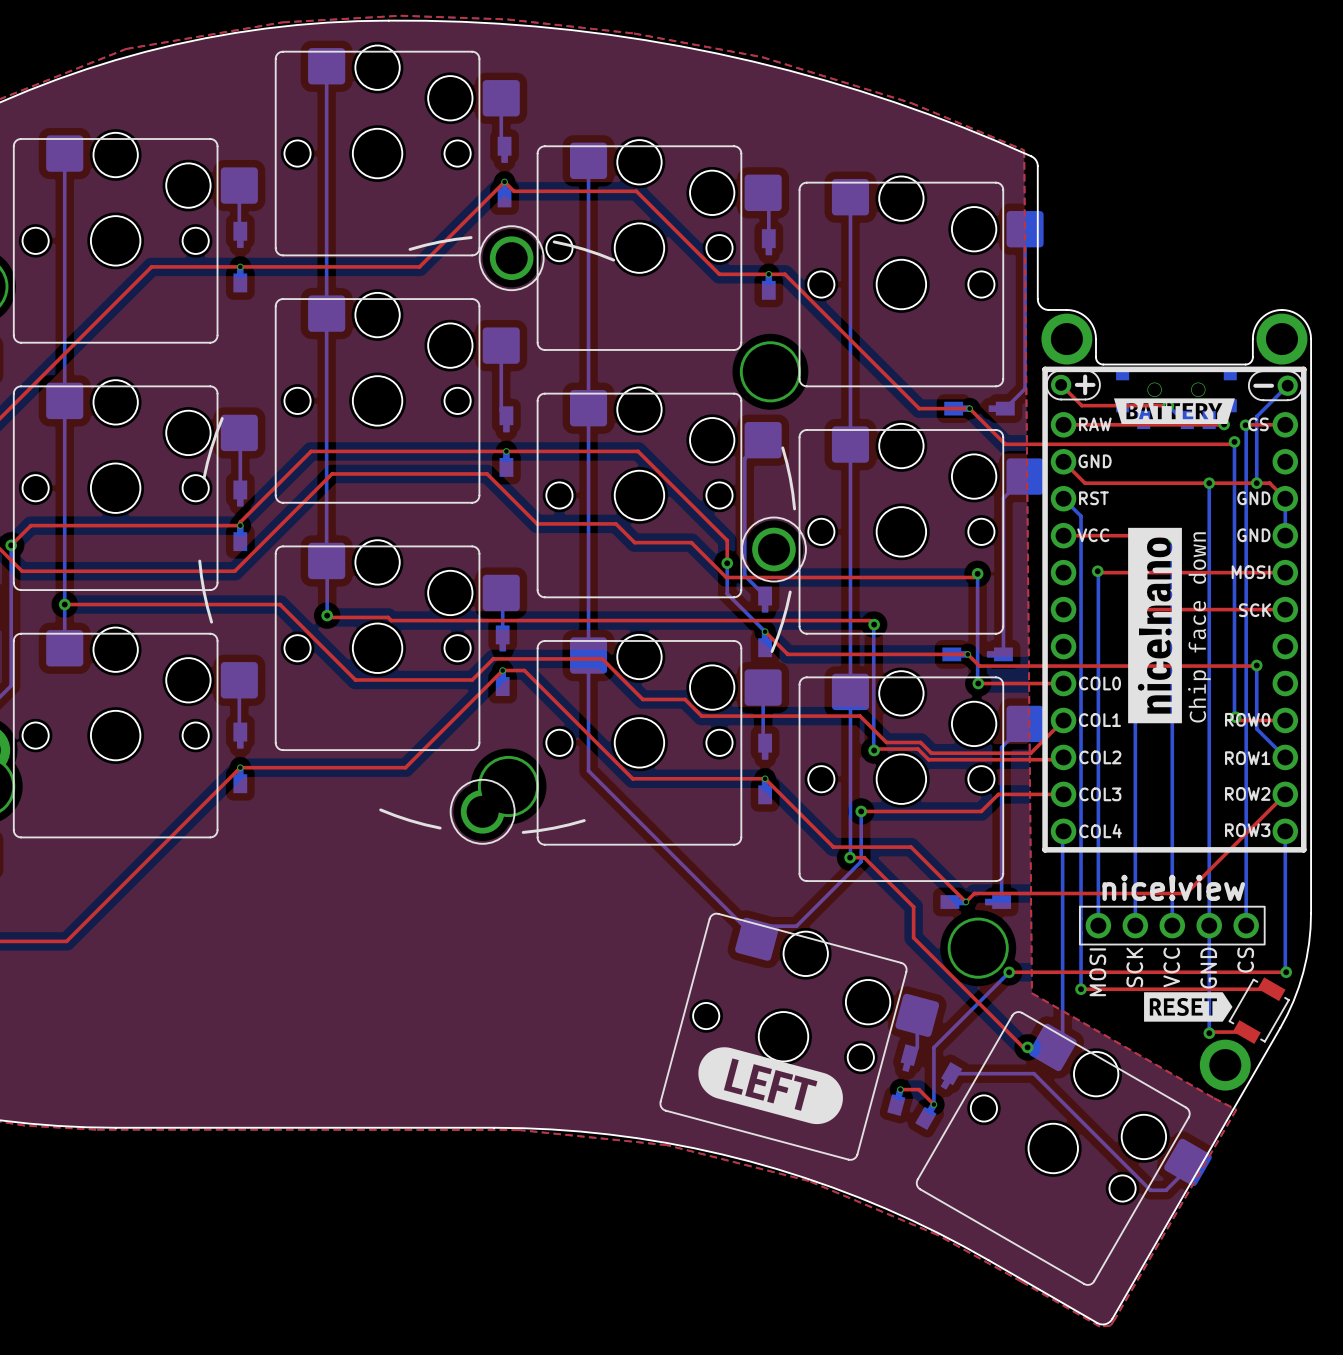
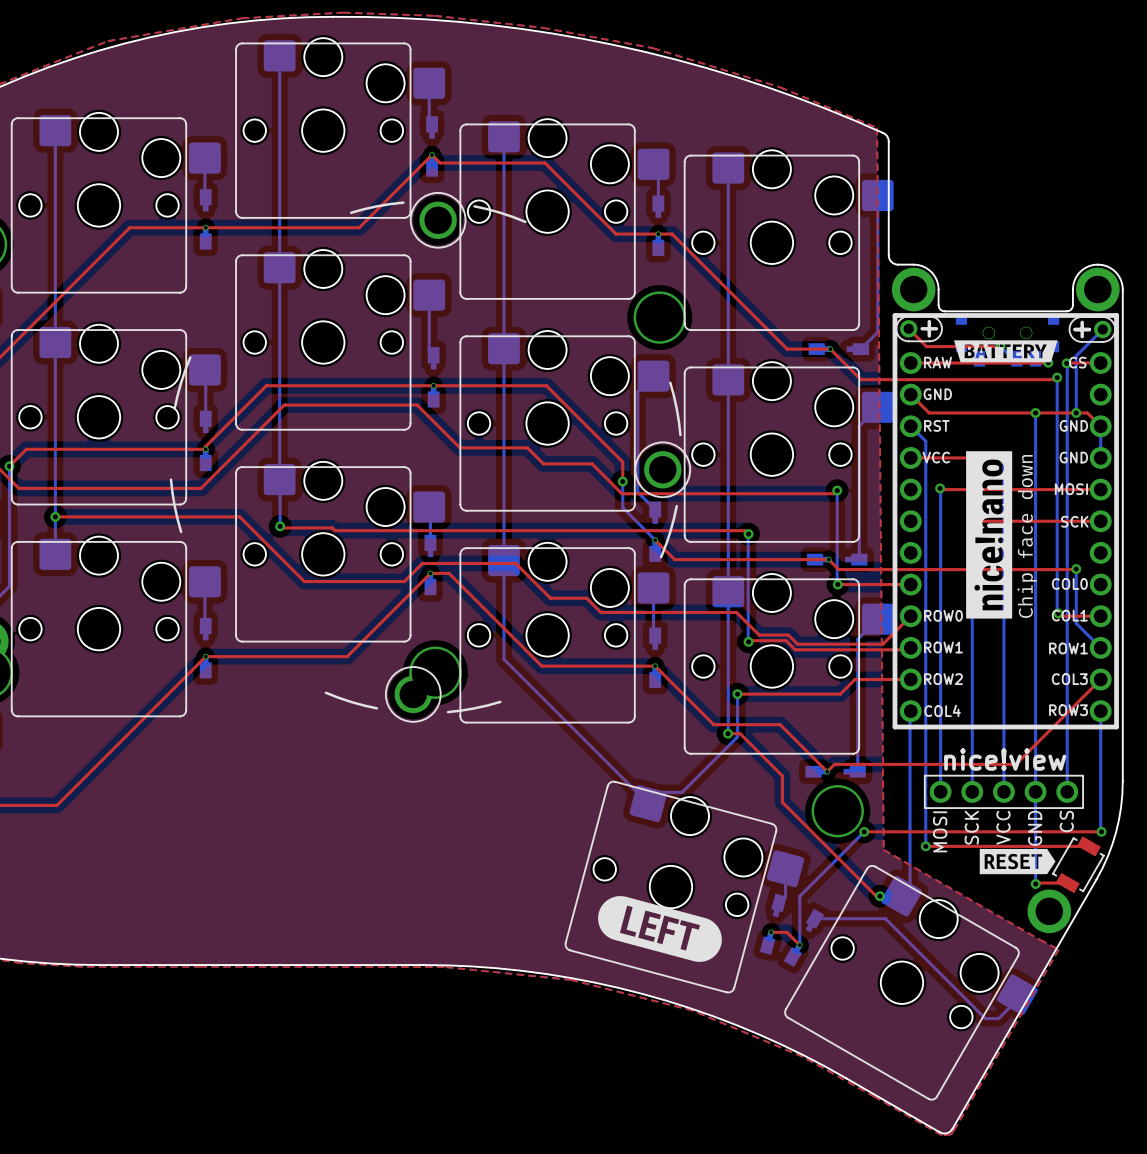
part footprint: [1248, 370, 1304, 402] -> [1068, 316, 1116, 343]
part text position: COL0 (1099, 683) -> COL0 (1069, 583)
part text position: ROW0 (1247, 719) -> ROW0 (943, 615)
part text position: COL1 (1099, 720) -> COL1 (1069, 615)
part text: COL2 (1100, 757) -> none
part text: none -> ROW1 (943, 647)
part text position: ROW2 (1247, 793) -> ROW2 (943, 679)
part text position: COL3 (1100, 794) -> COL3 (1069, 679)

